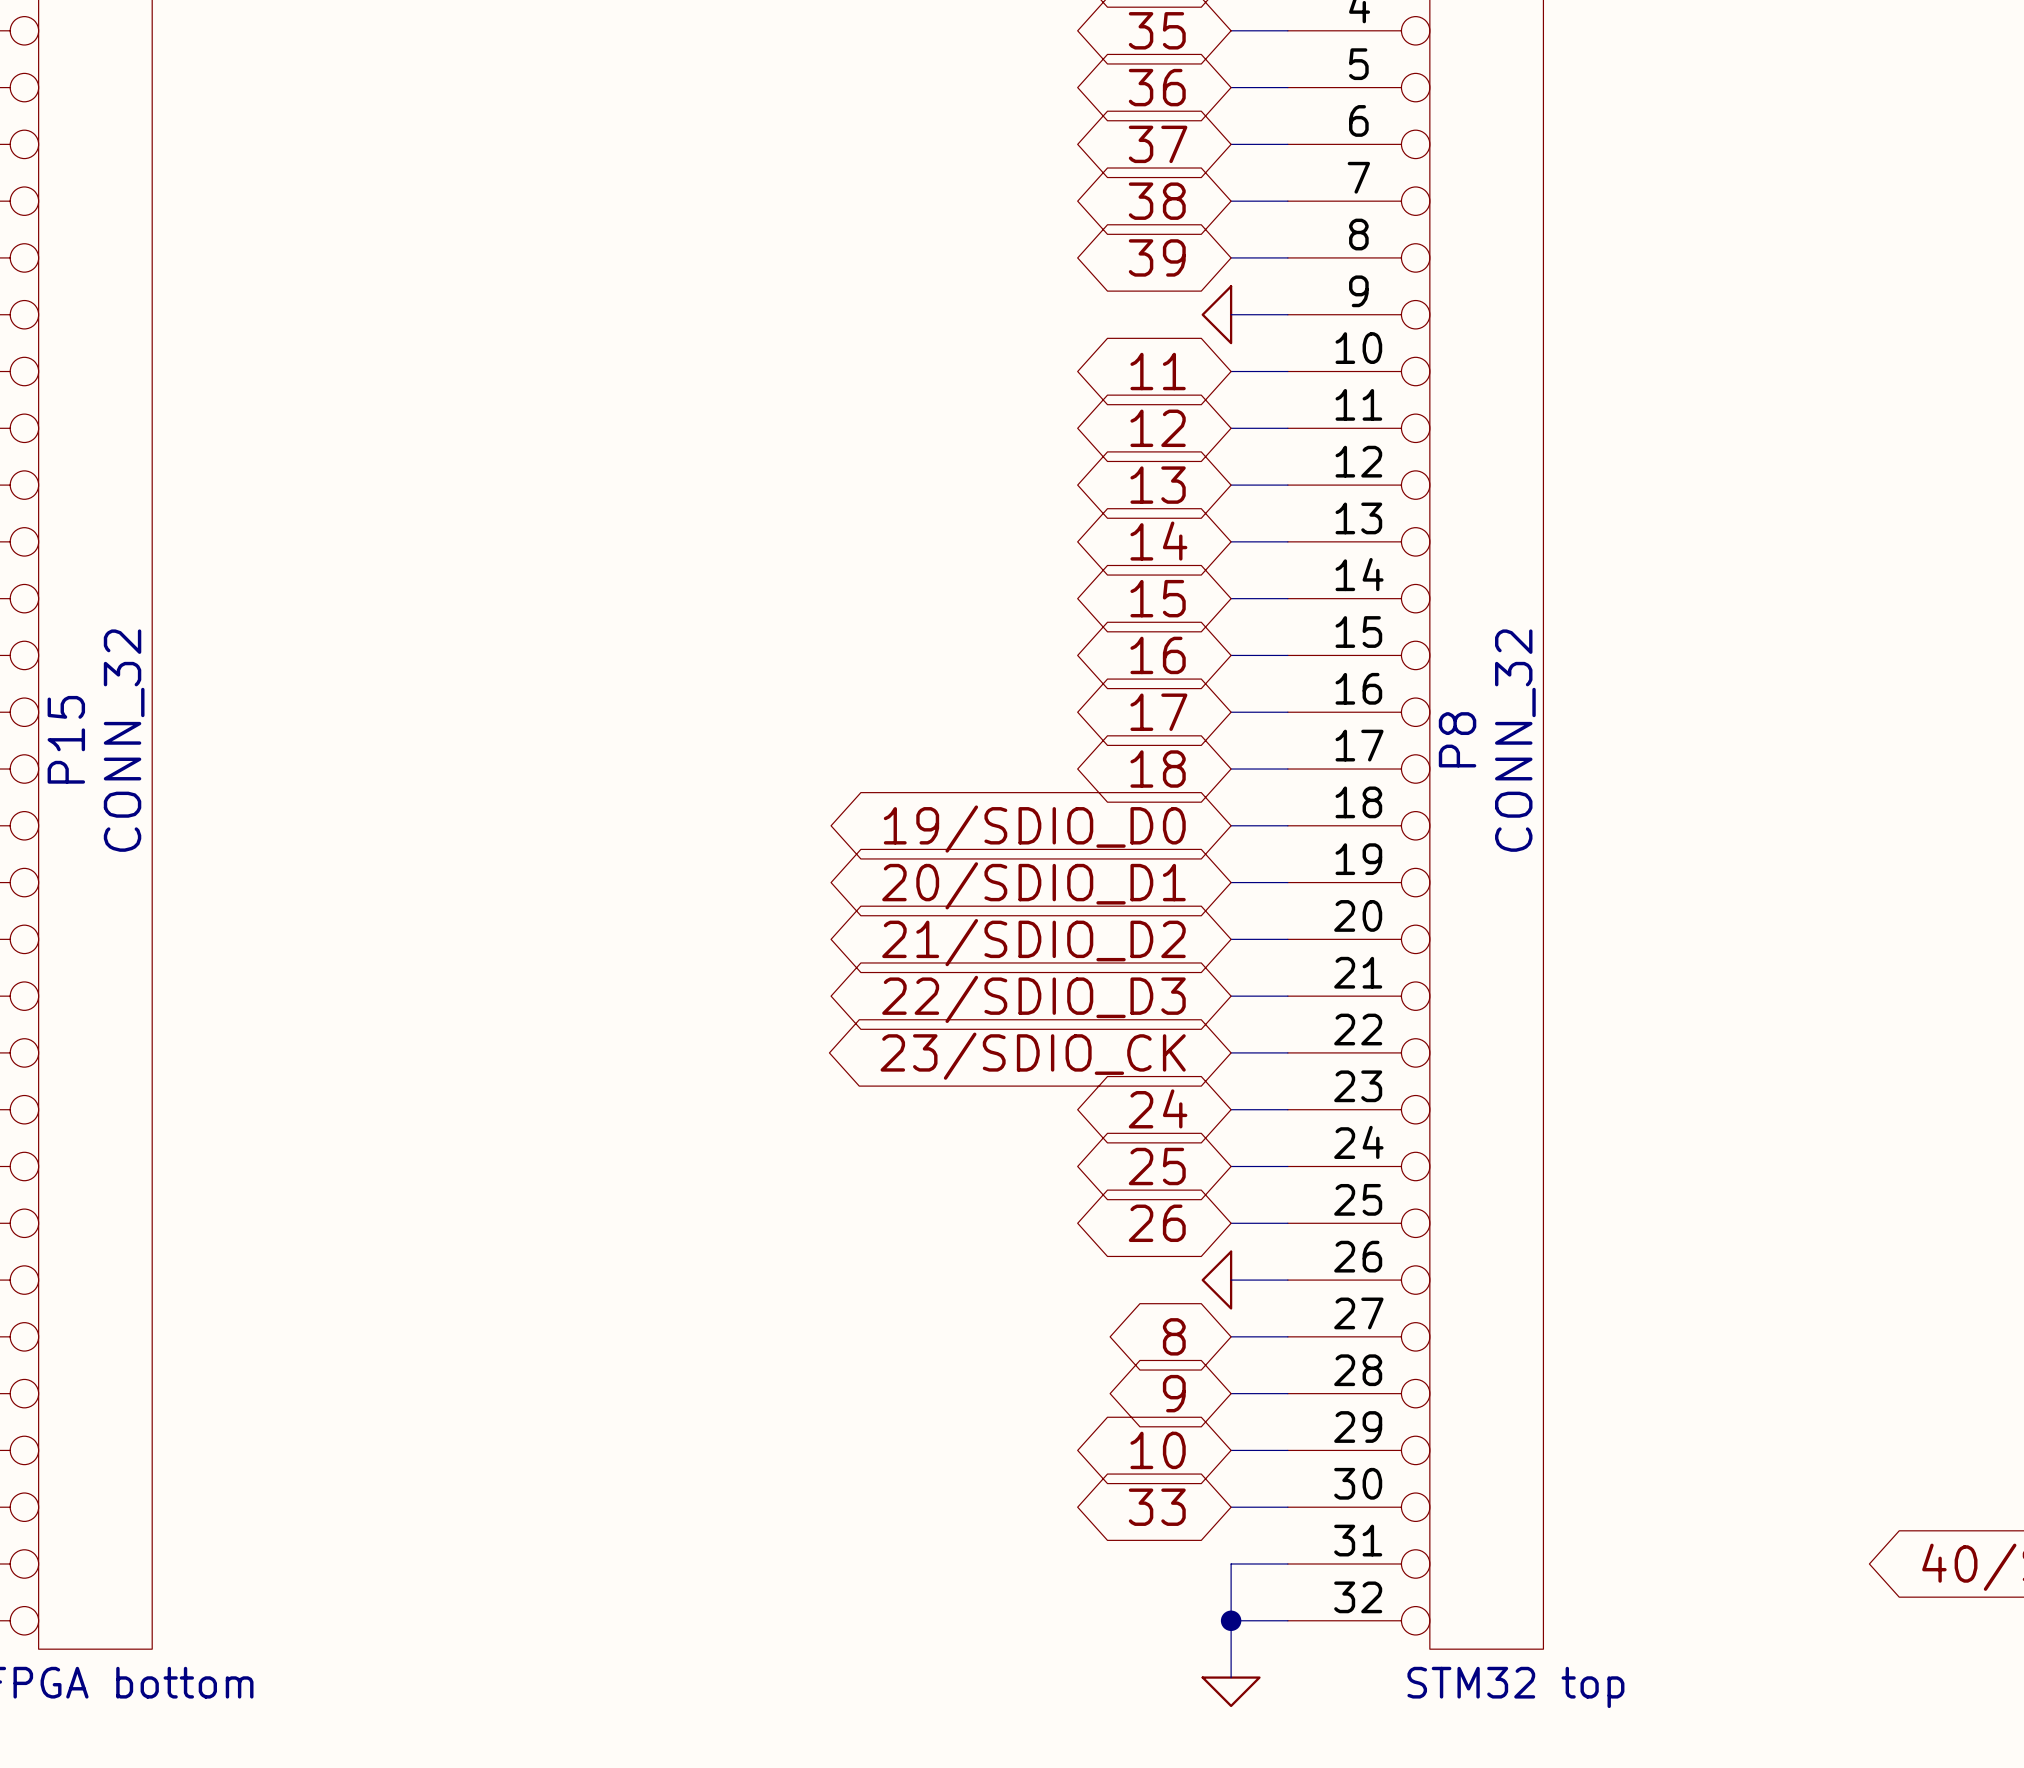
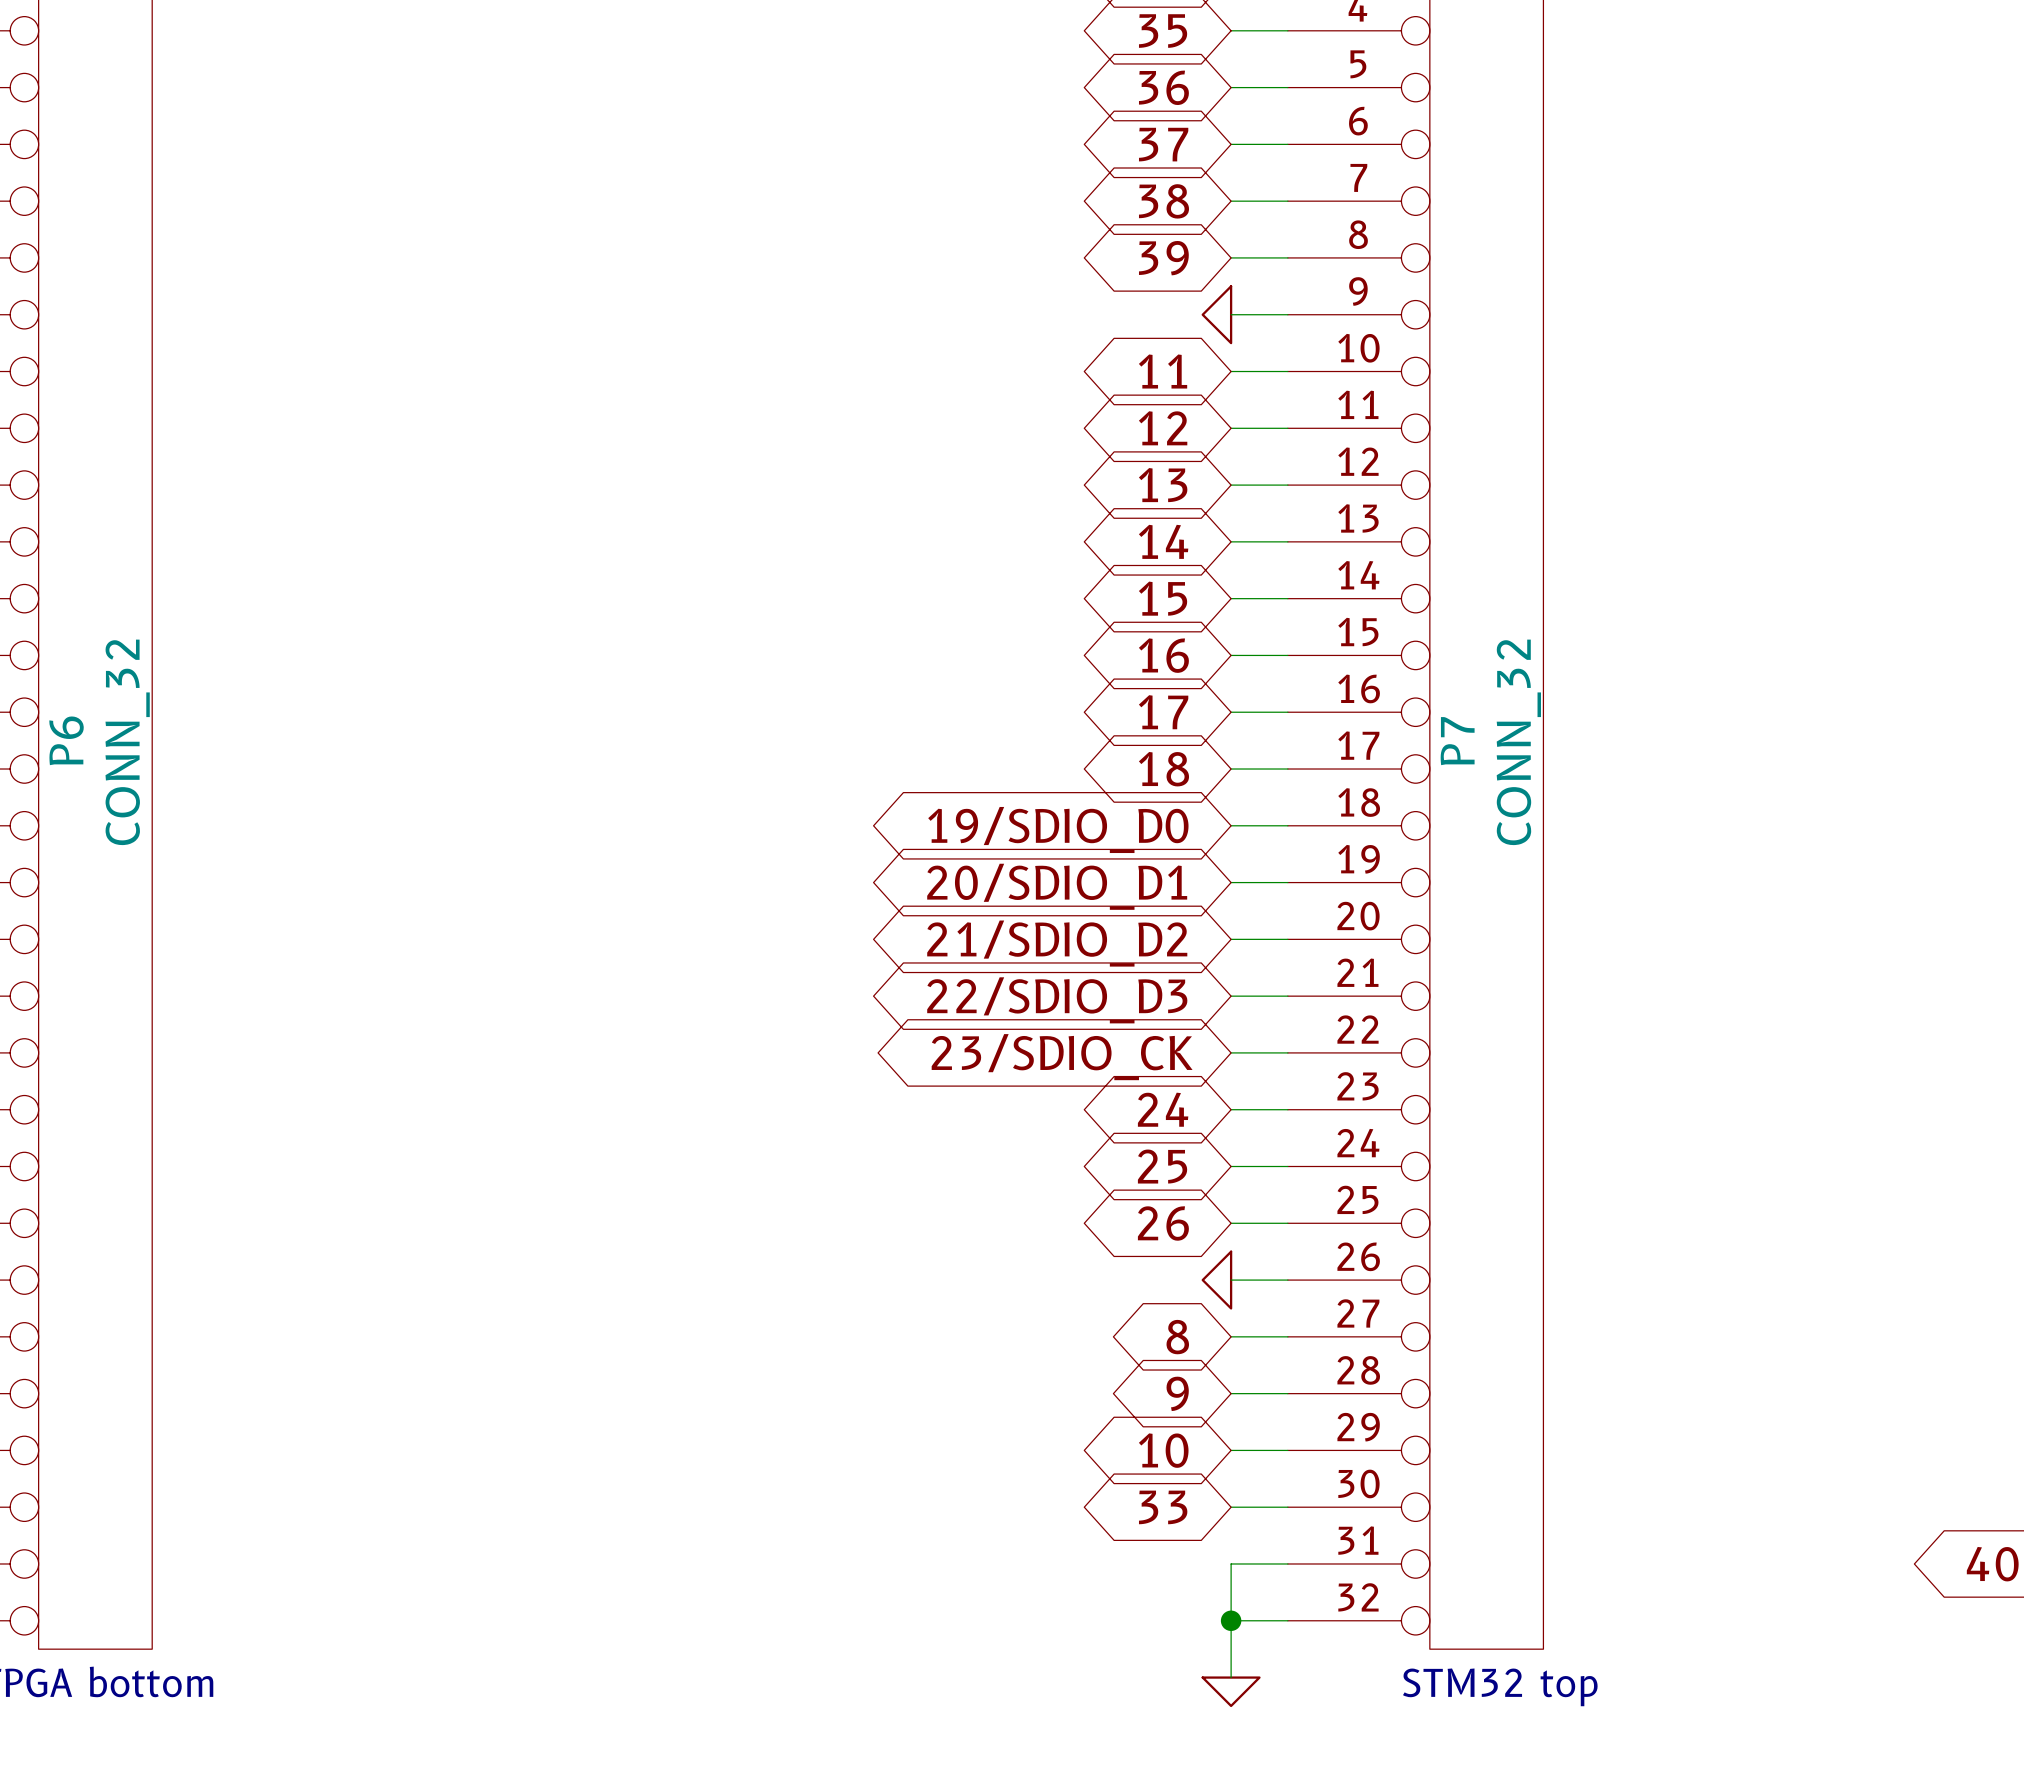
P15 name: P15 (66, 739) -> P6 (66, 740)
P8 name: P8 (1457, 739) -> P7 (1457, 741)

